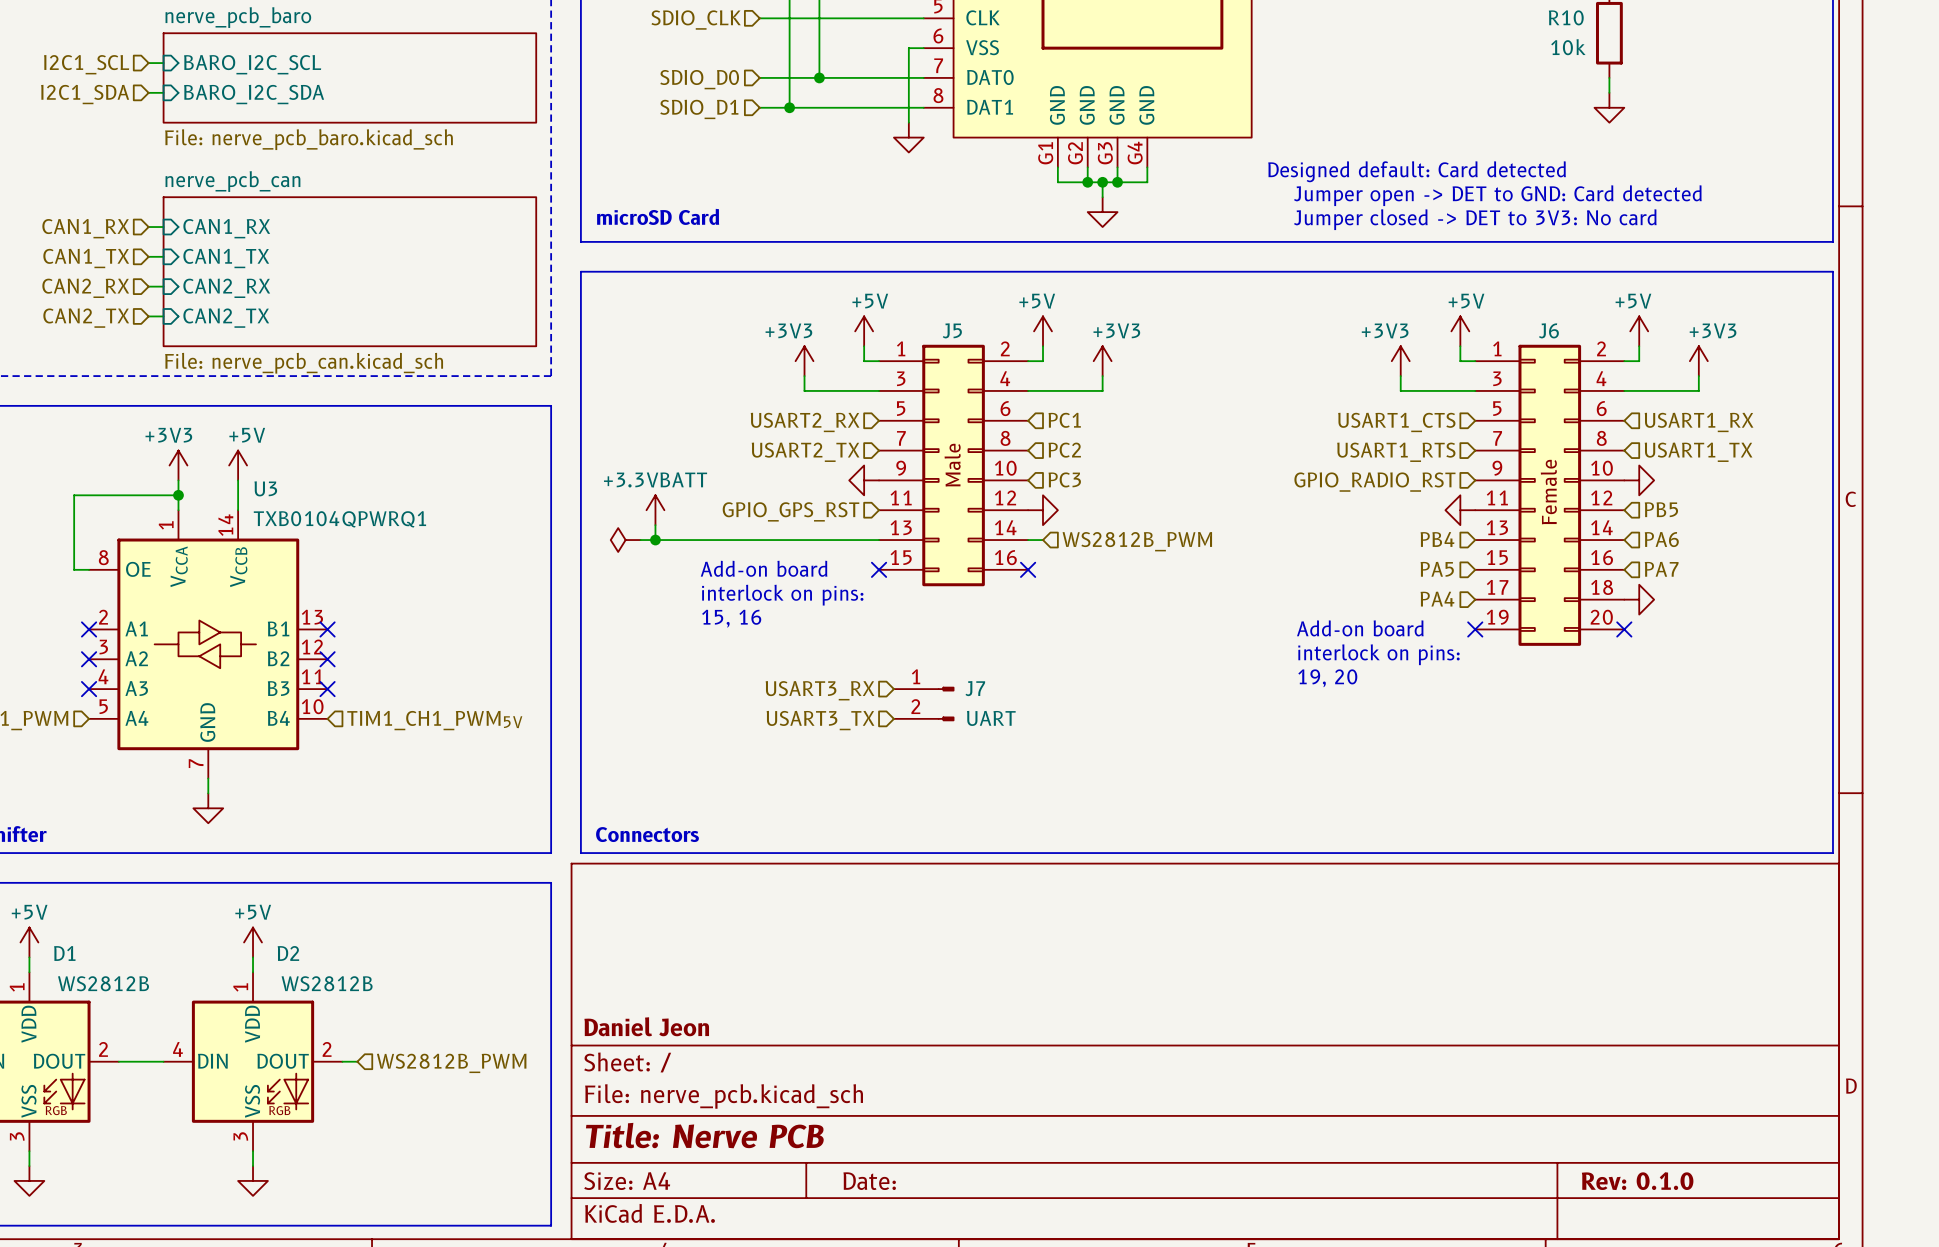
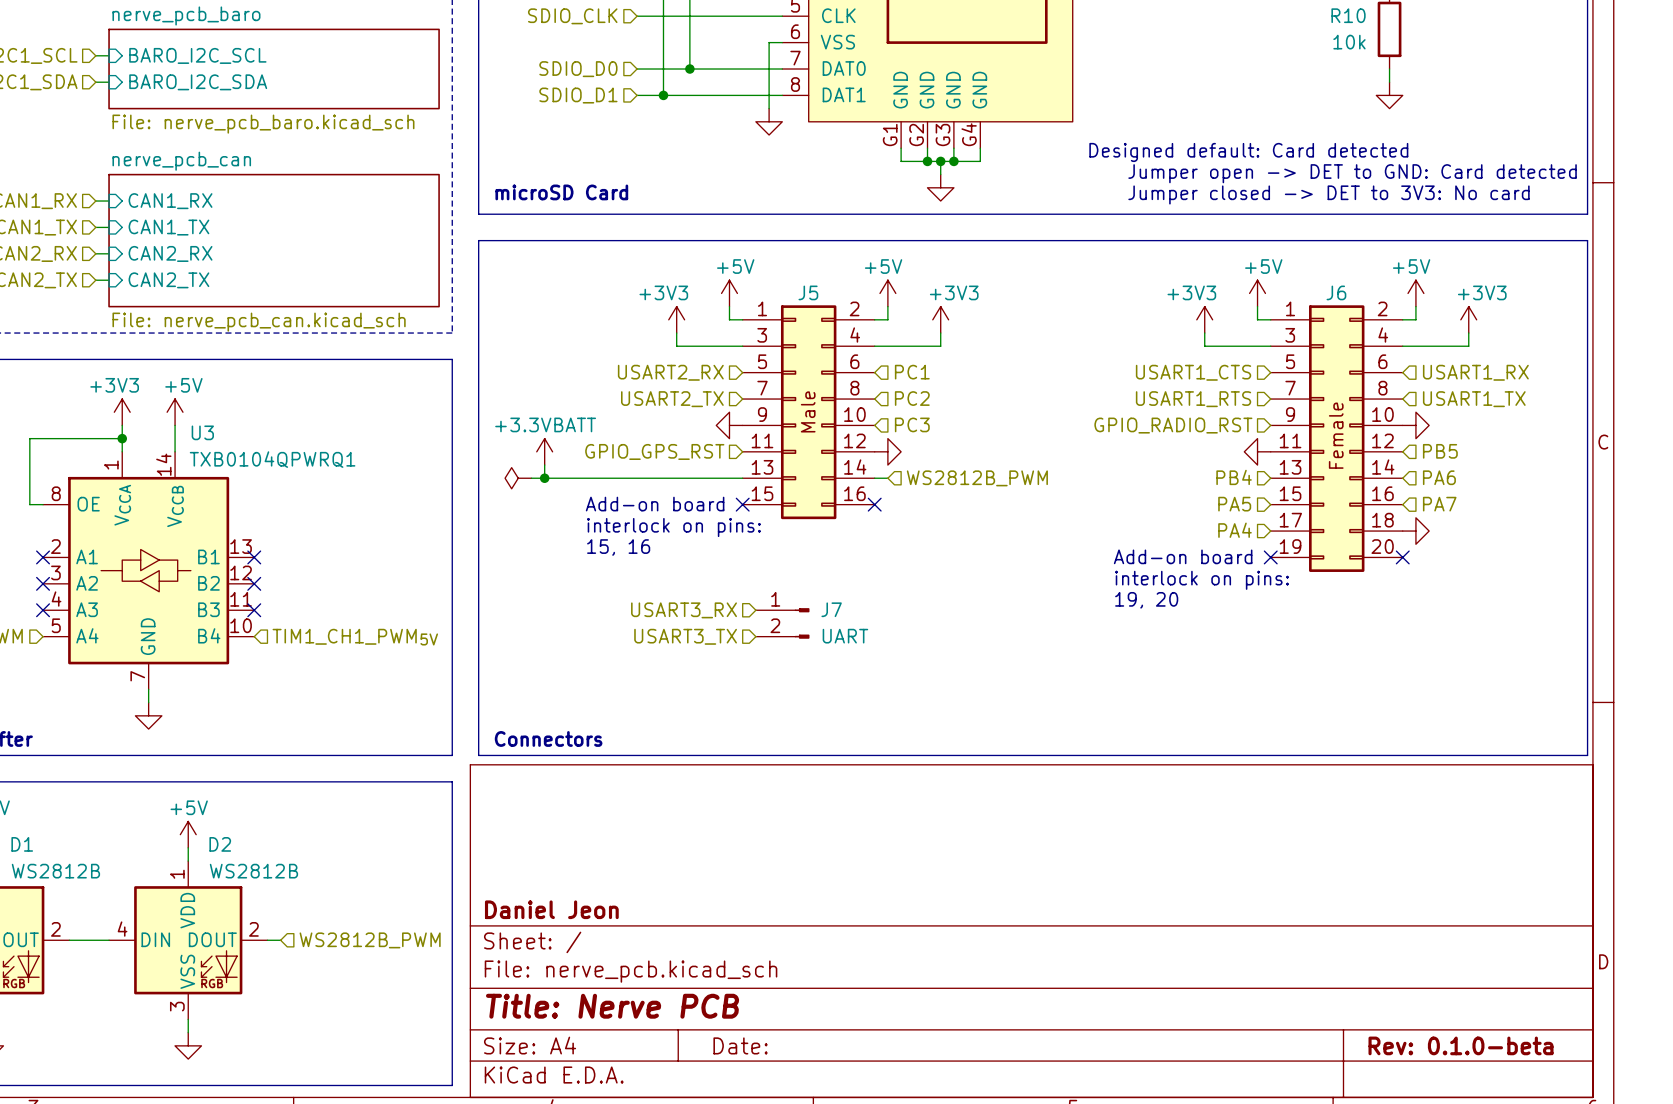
title block: Rev: 0.1.0 (1637, 1181) -> Rev: 0.1.0-beta (1461, 1045)

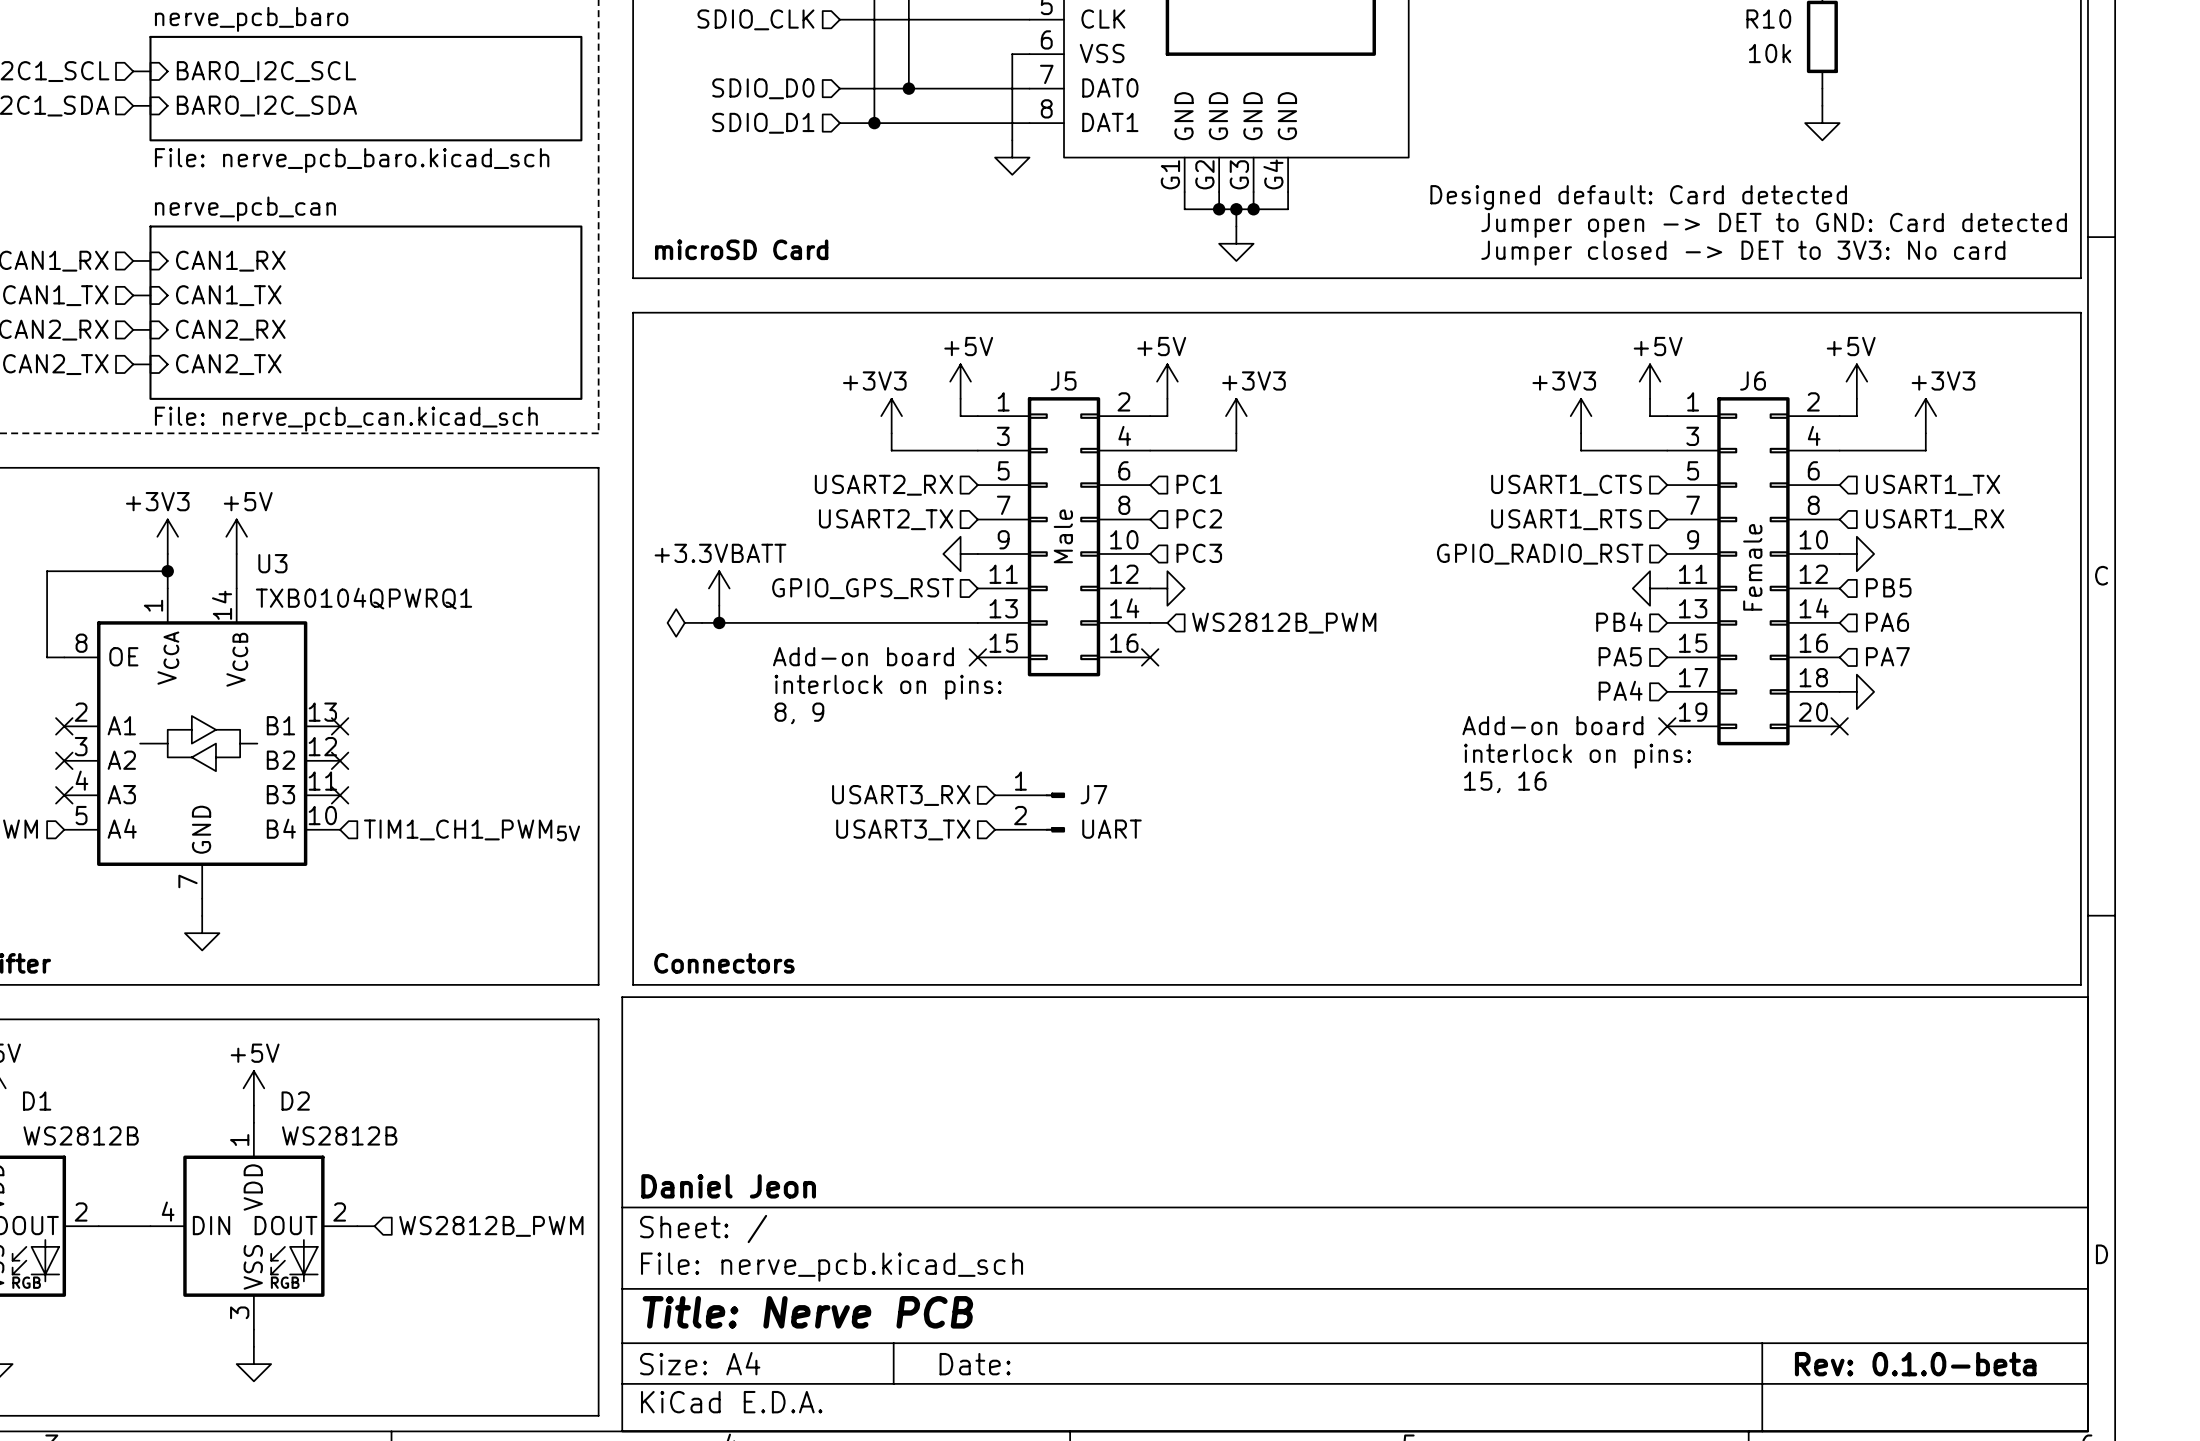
hierarchical label: USART1_RX (1475, 372) -> USART1_TX (1933, 485)
hierarchical label: USART1_TX (1474, 399) -> USART1_RX (1935, 519)
text: 15, 16 (618, 547) -> 8, 9 (799, 713)
text: 19, 20 (1146, 600) -> 15, 16 (1505, 782)

